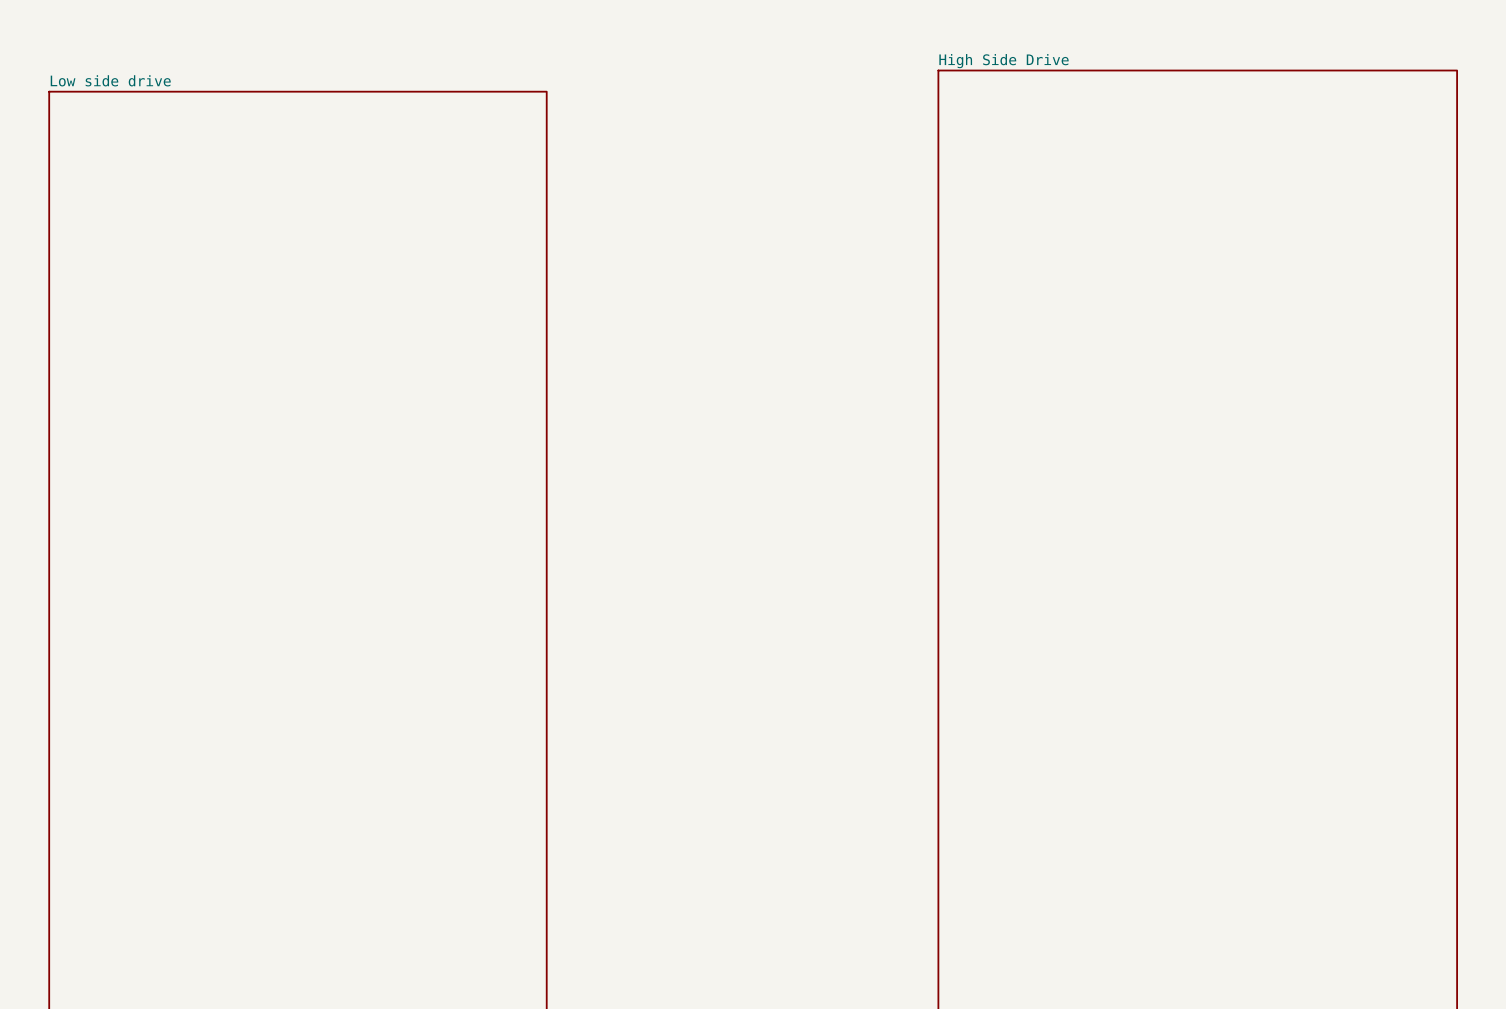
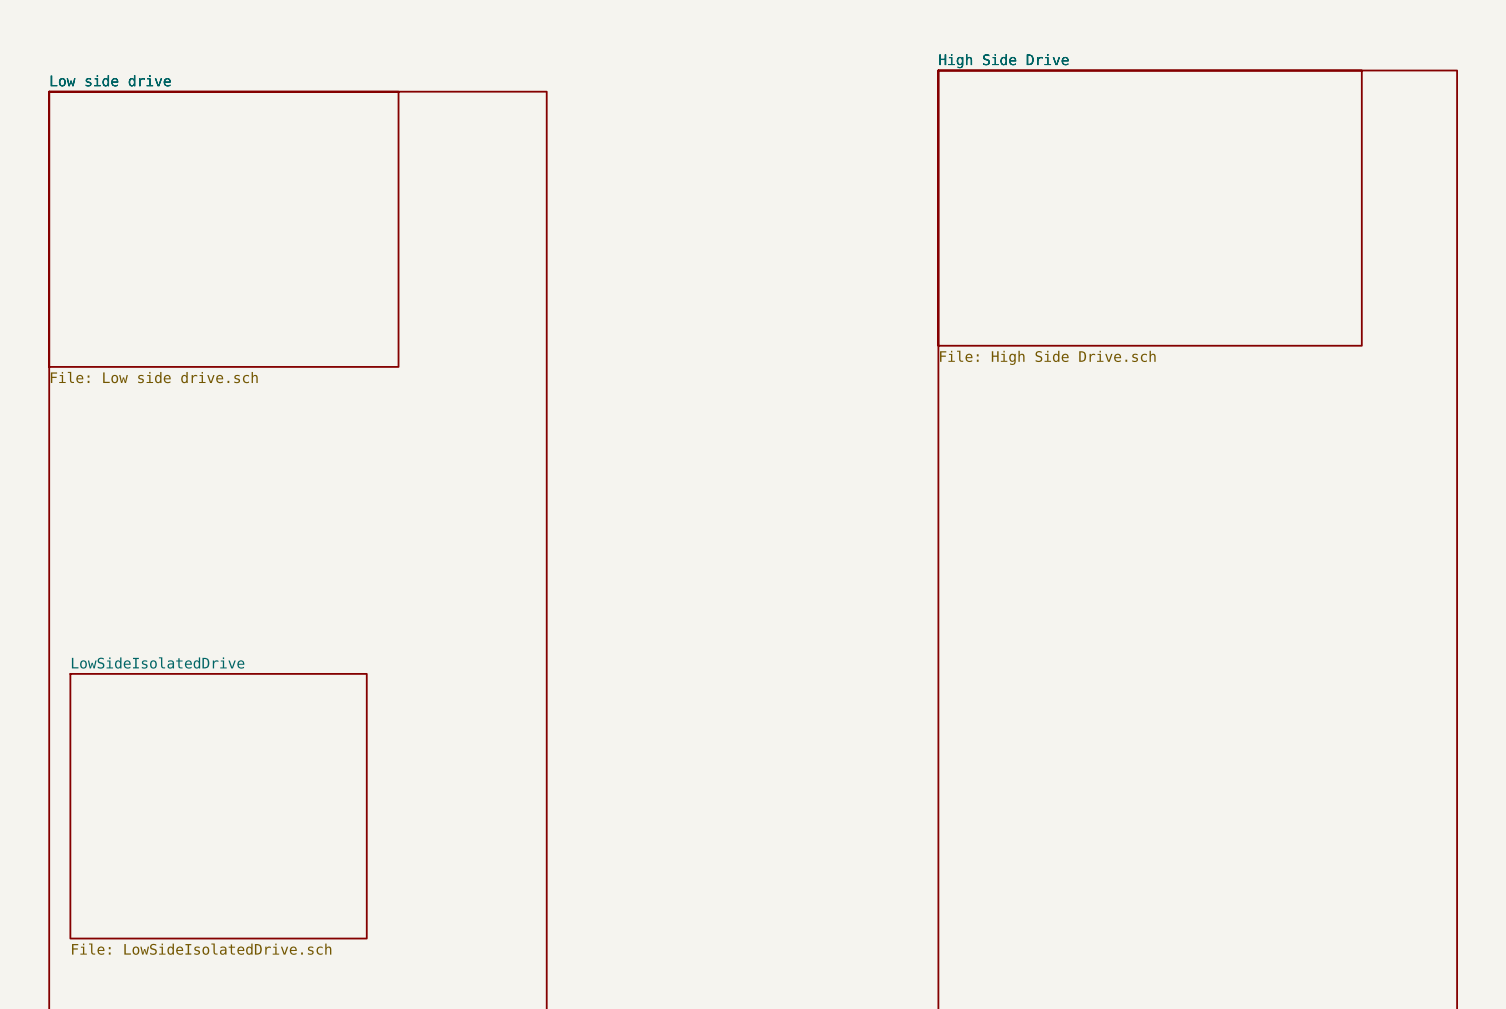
sheet High Side Drive: none -> File: High Side Drive.sch (1150, 208)
sheet Low side drive: none -> File: Low side drive.sch (223, 229)
sheet LowSideIsolatedDrive: none -> File: LowSideIsolatedDrive.sch (218, 806)

